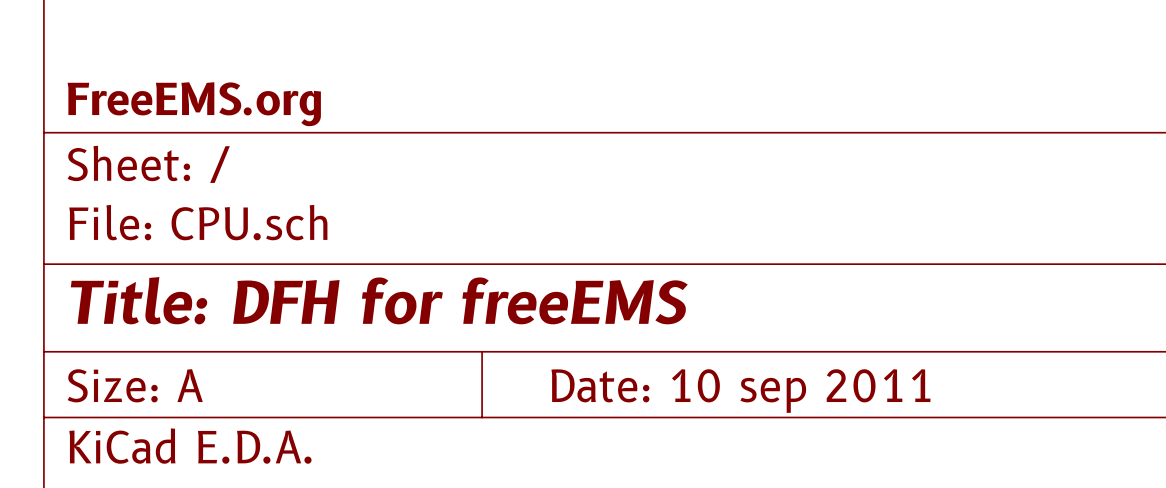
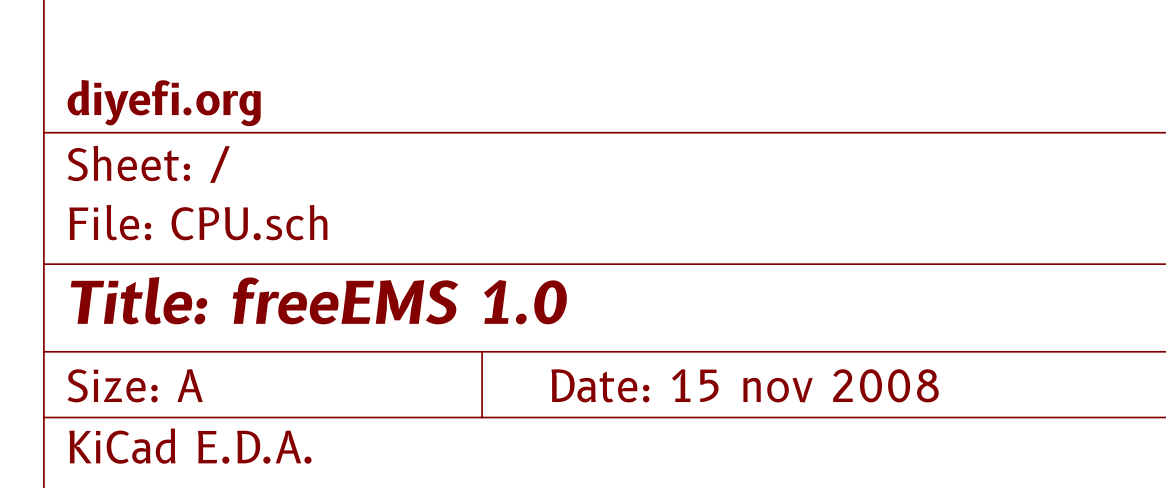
title block: FreeEMS.org (194, 104) -> diyefi.org (164, 103)
title block: Title: DFH for freeEMS (379, 300) -> Title: freeEMS 1.0 (318, 300)
title block: Date: 10 sep 2011 (740, 391) -> Date: 15 nov 2008 (745, 385)

